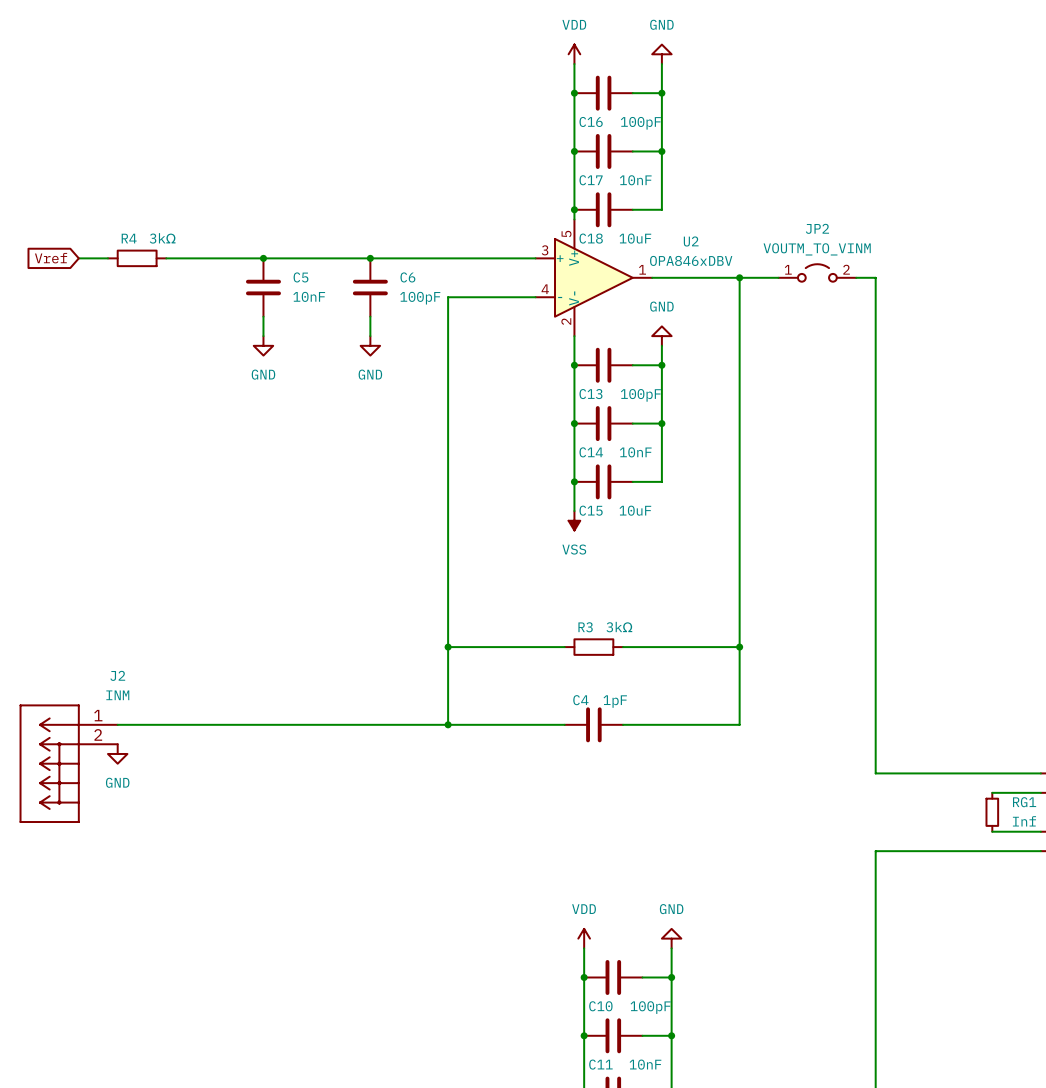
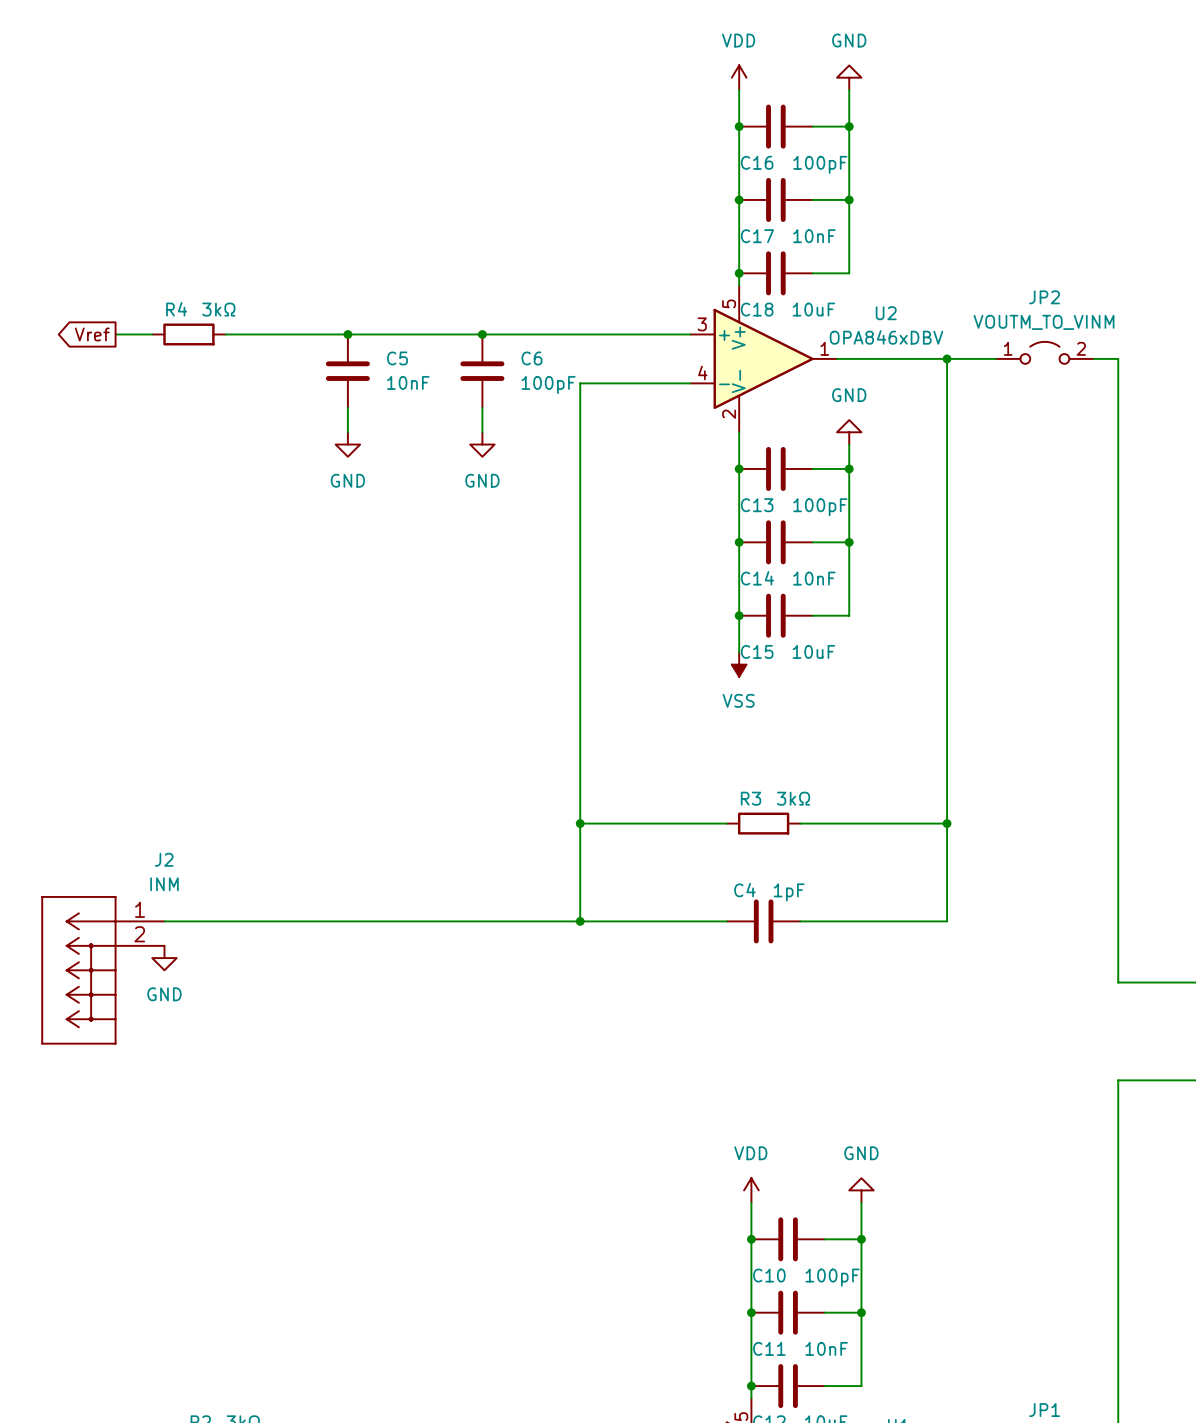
global label shape: input (51, 258) -> output (92, 334)

